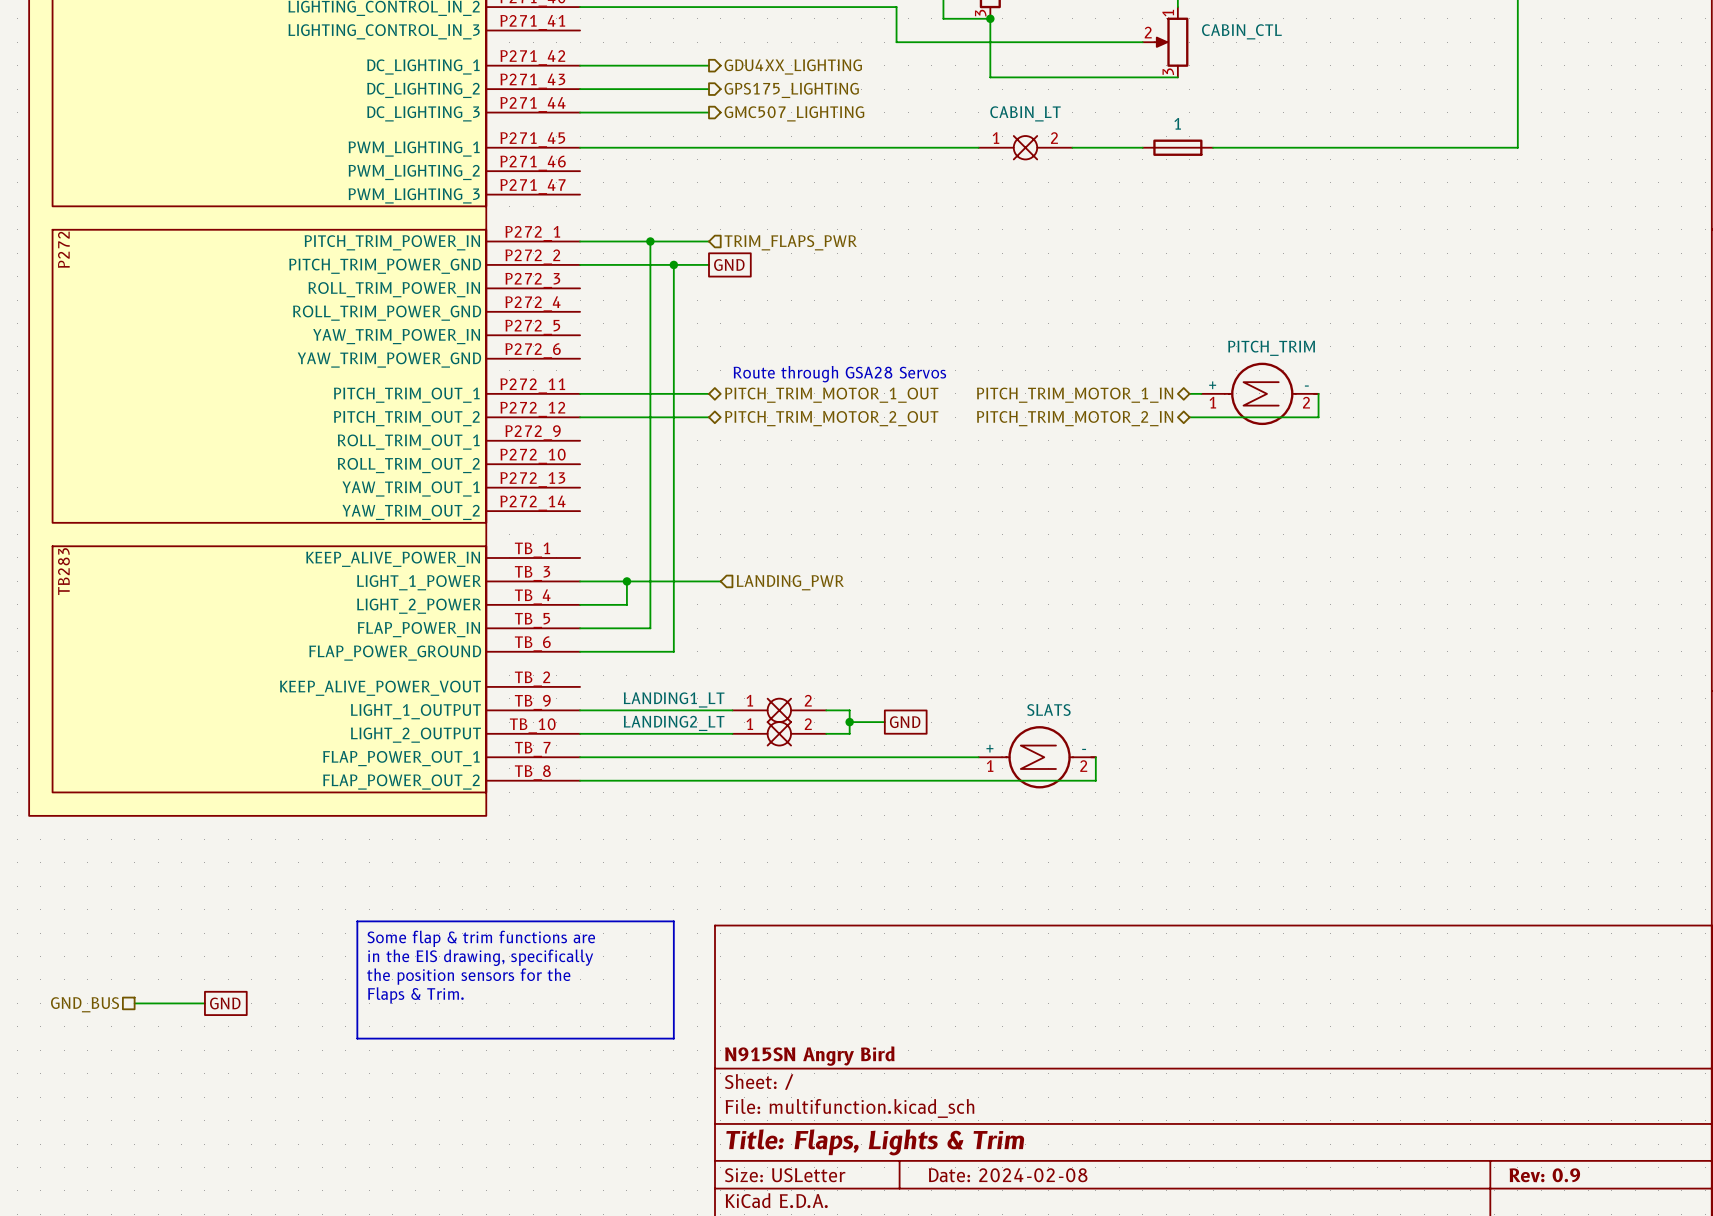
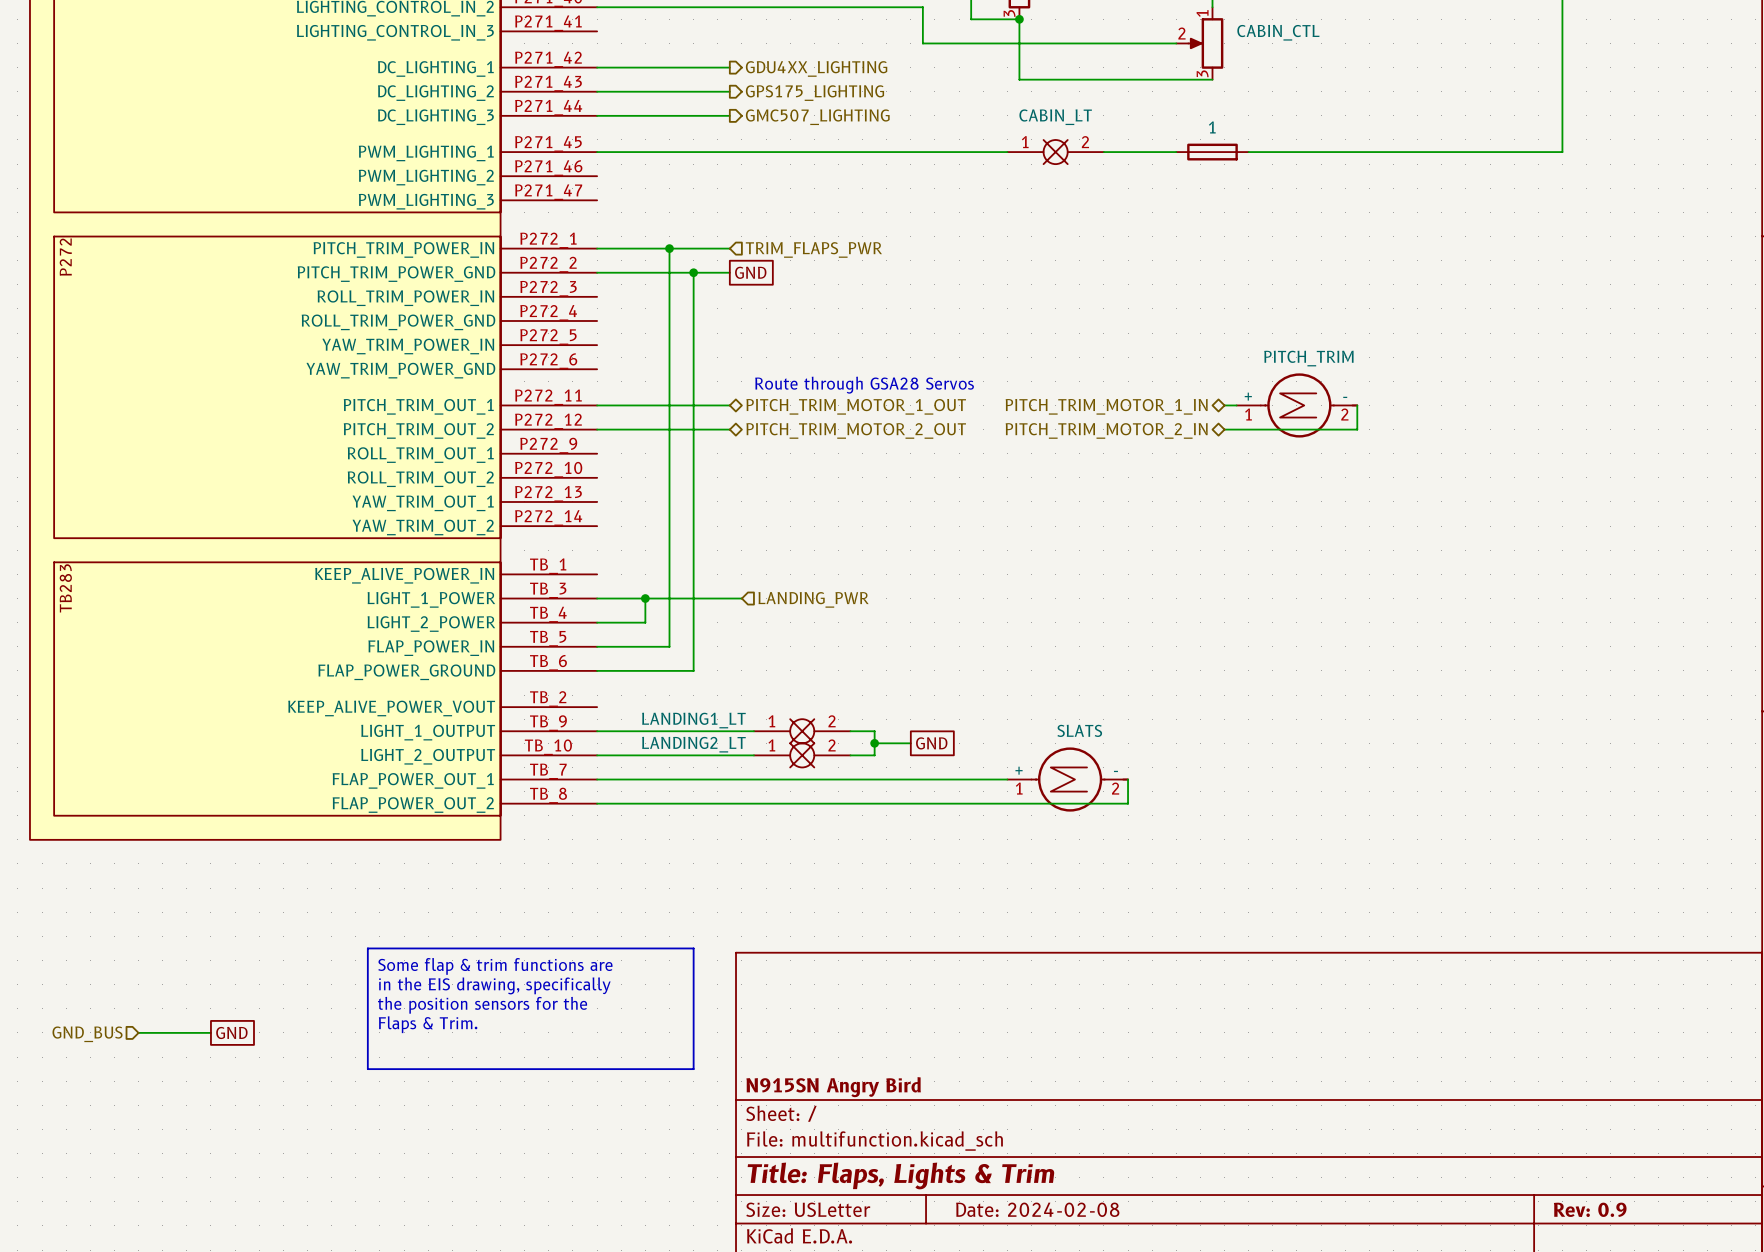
hierarchical label shape: passive (85, 1004) -> input (87, 1034)

